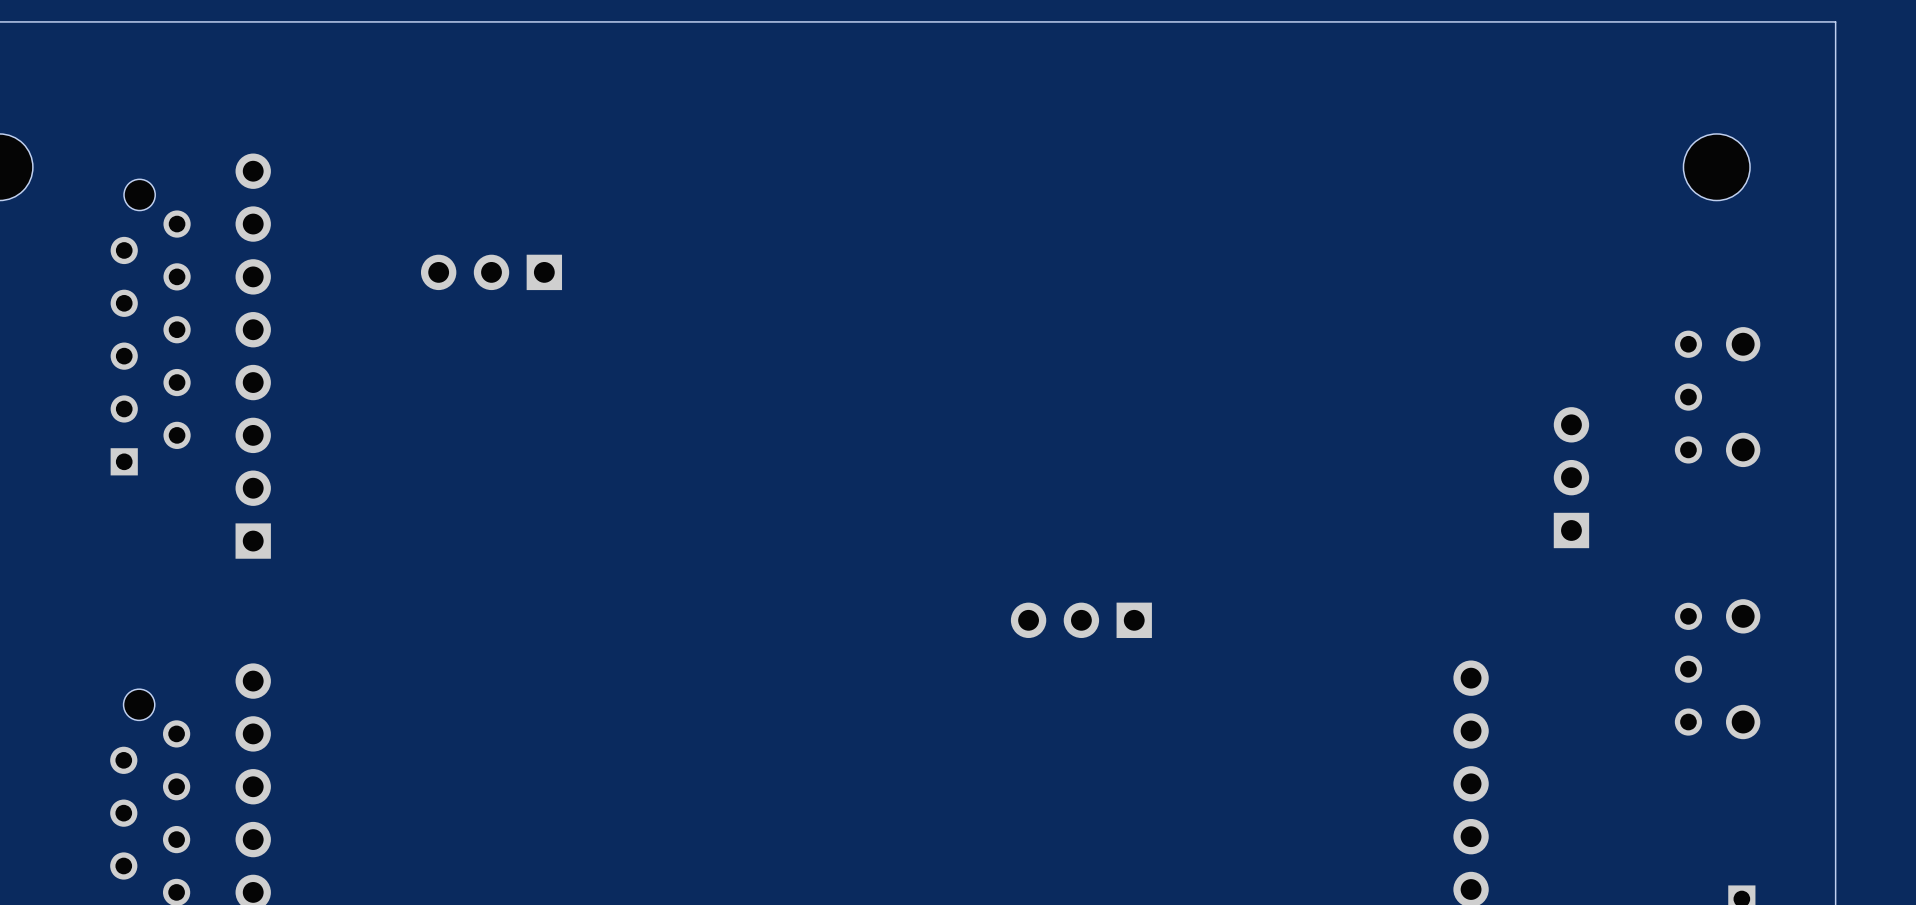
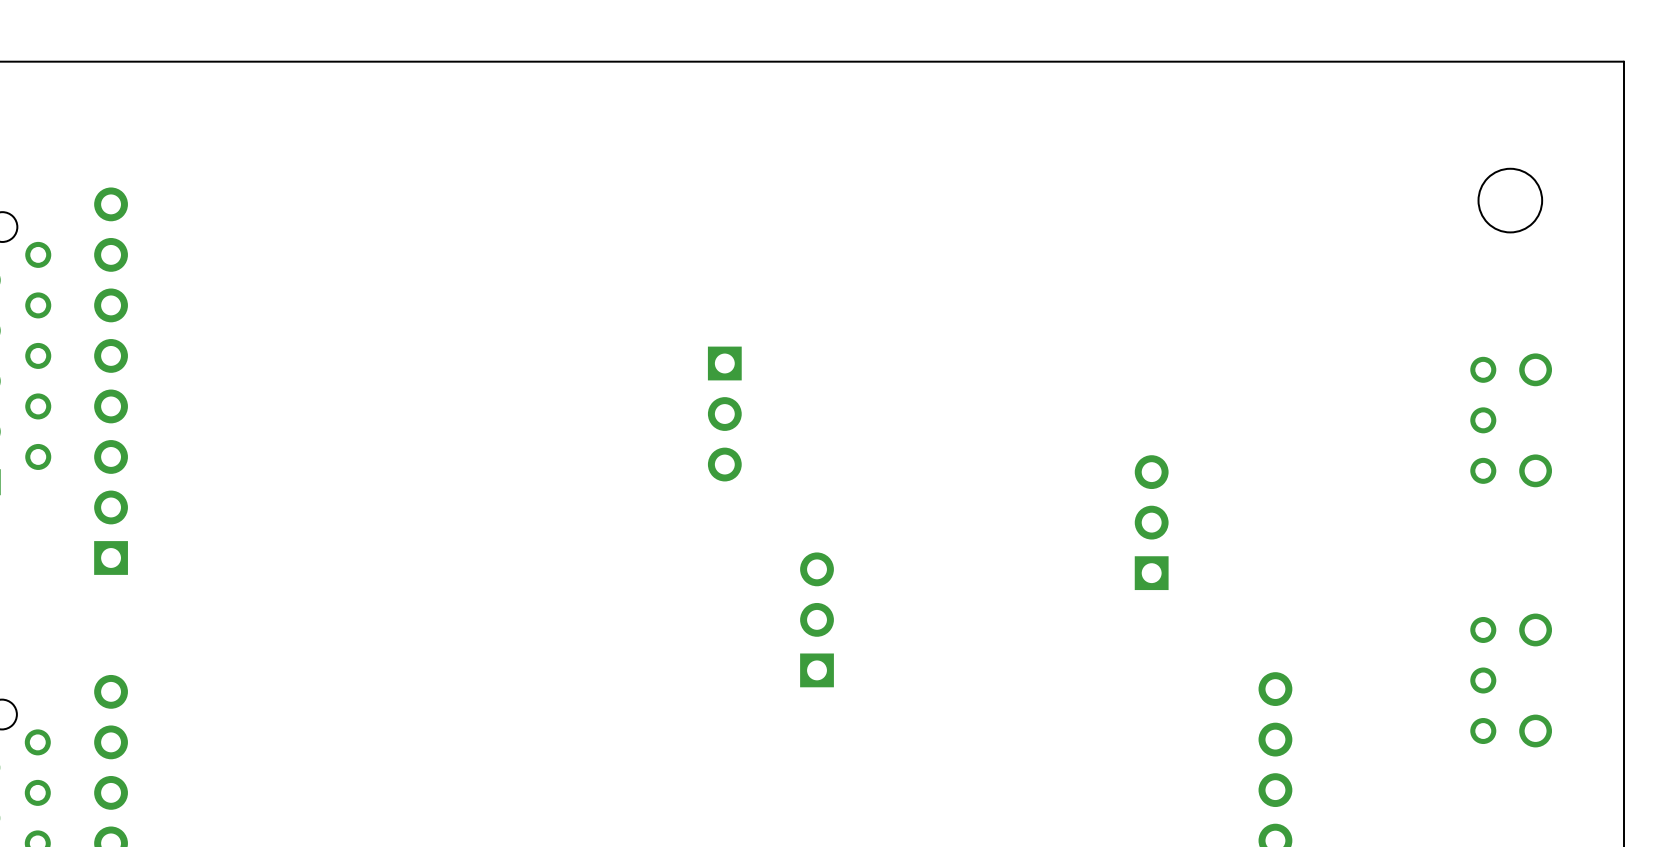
part: (491, 272) -> none
part: none -> (724, 414)
part: (1571, 477) -> none
part: none -> (1151, 522)
part rotation: 0° (1081, 620) -> 90° clockwise (817, 619)
part position: (1081, 620) -> (817, 619)

